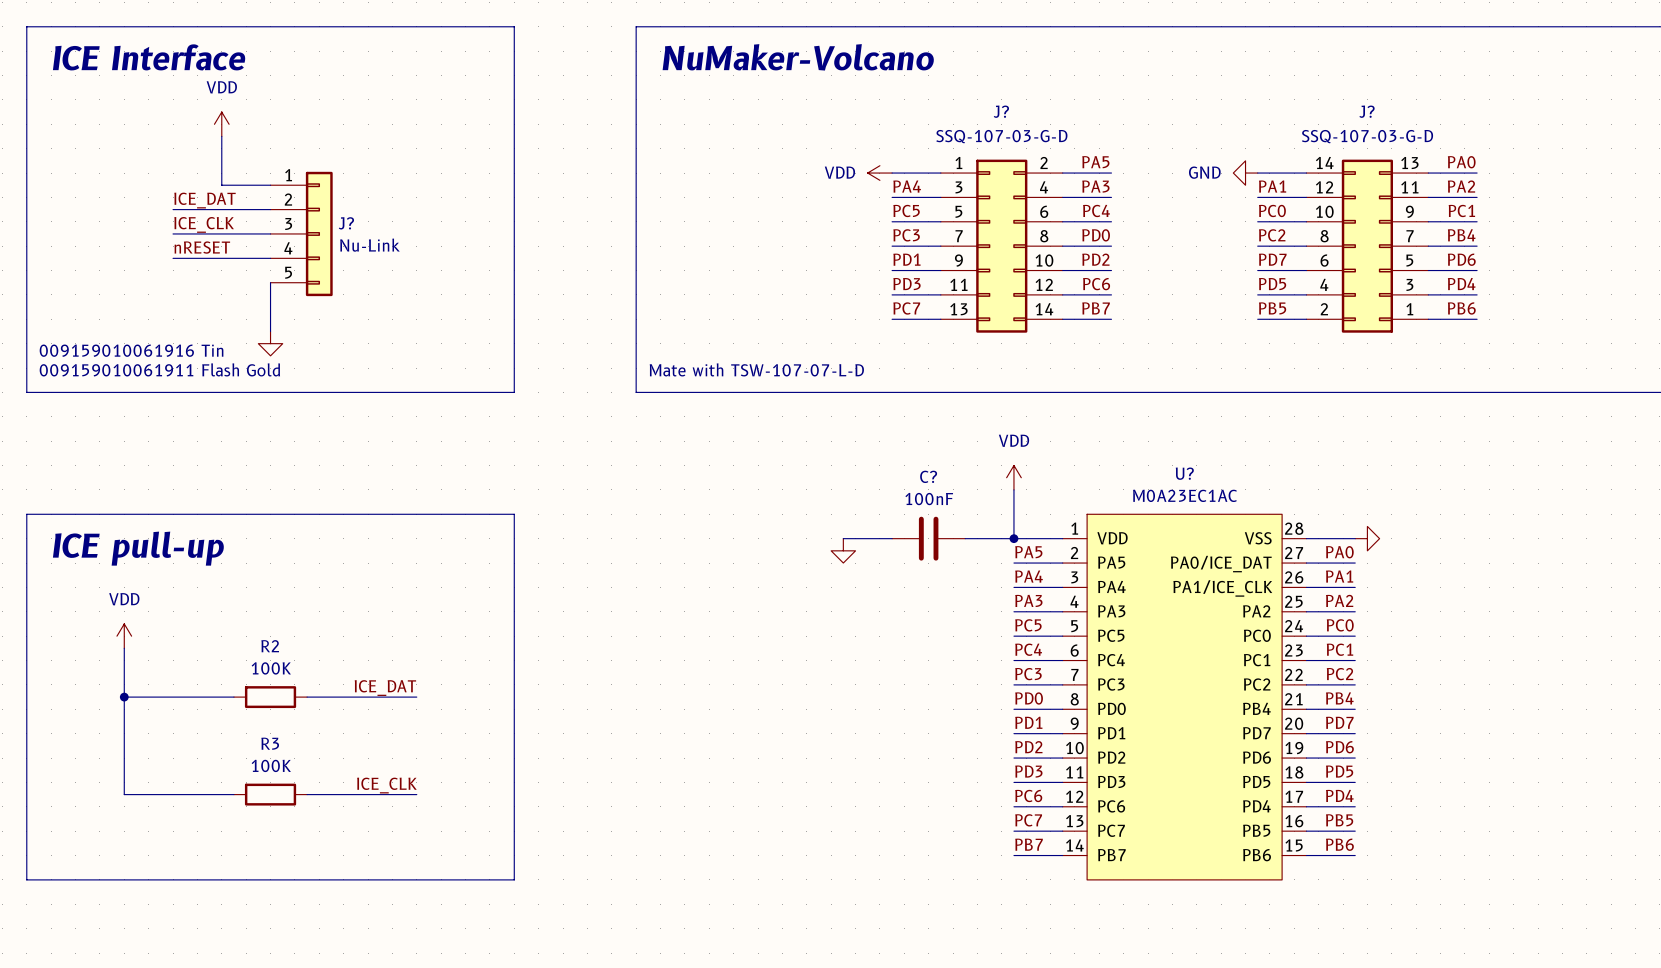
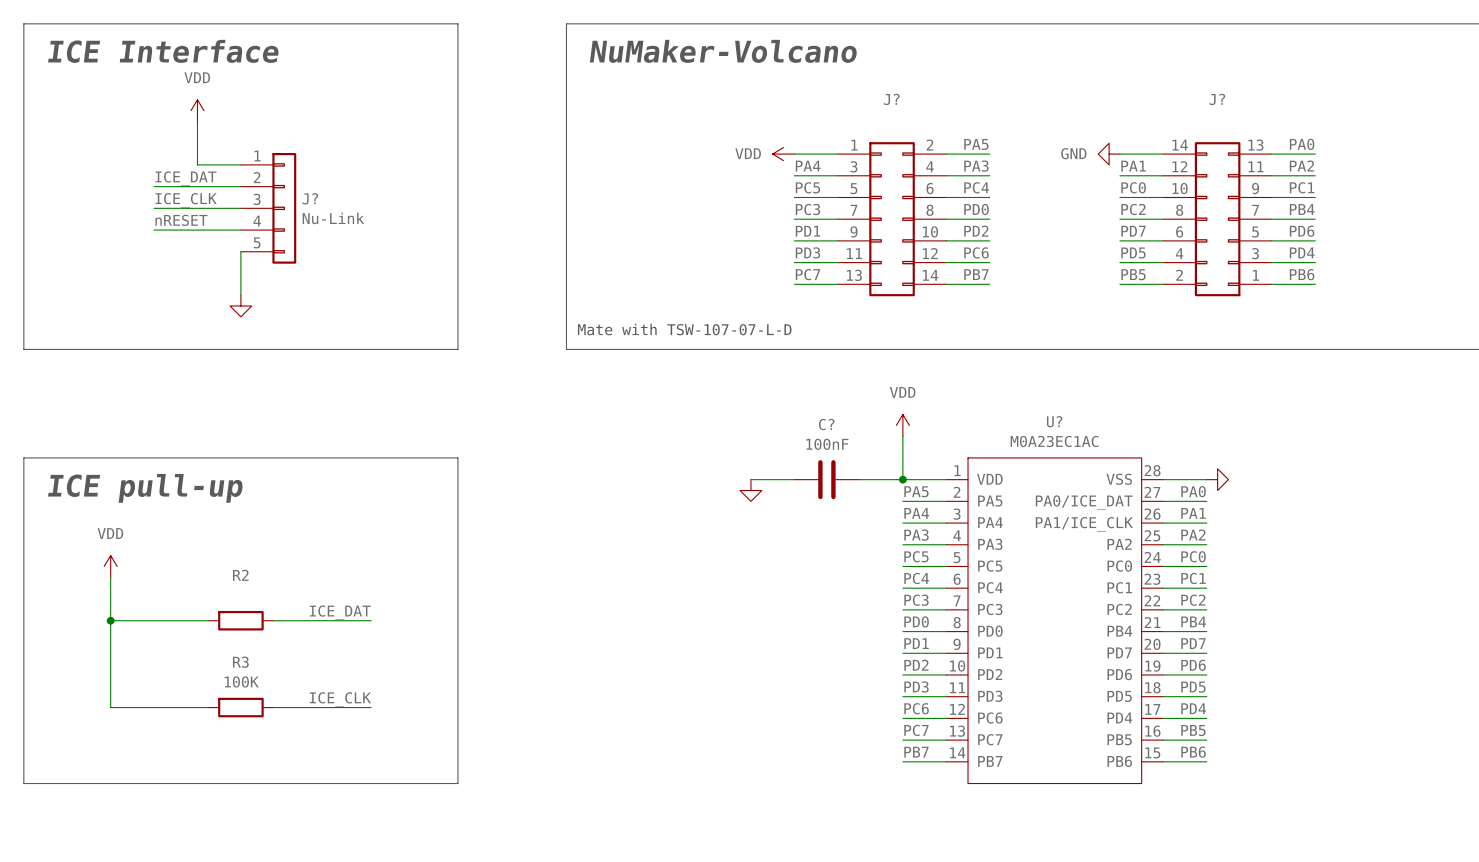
J? value: SSQ-107-03-G-D (1001, 136) -> none
J? value: SSQ-107-03-G-D (1367, 136) -> none
text: 009159010061916 Tin (131, 350) -> none
text: 009159010061911 Flash Gold (159, 369) -> none
R2 value: 100K (271, 668) -> none

